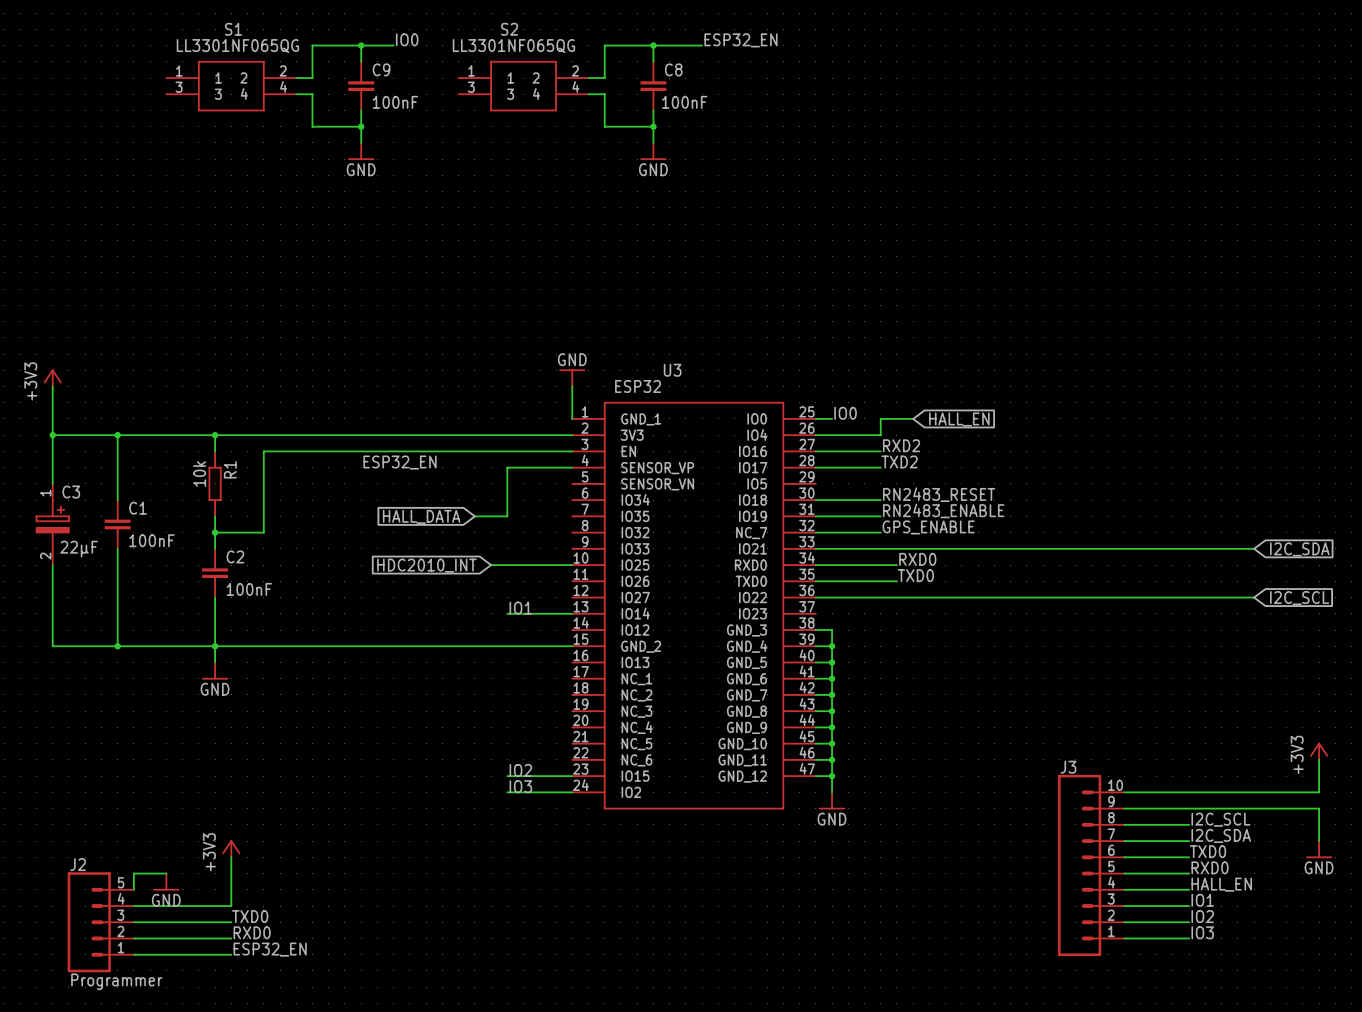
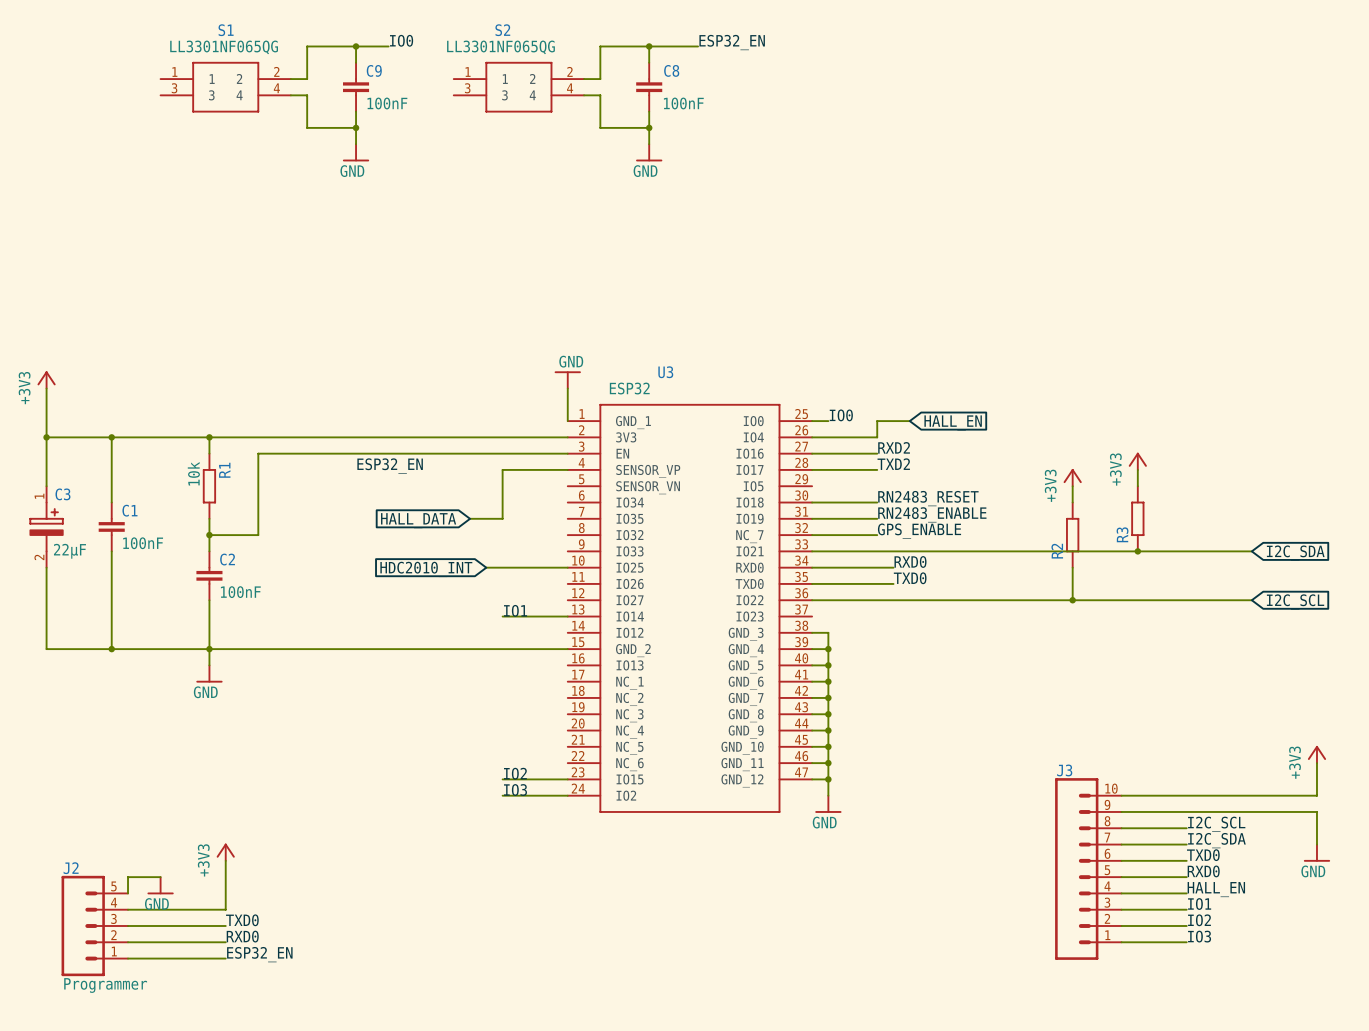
power symbol: none -> +3V3 (1137, 461)
wire: none -> (1137, 469) (1137, 486)
power symbol: none -> +3V3 (1072, 477)
wire: none -> (1072, 486) (1072, 502)
R3: none -> (1137, 518)
R2: none -> (1072, 535)
junction: none -> (1137, 551)
wire: none -> (1072, 567) (1072, 600)
junction: none -> (1072, 600)

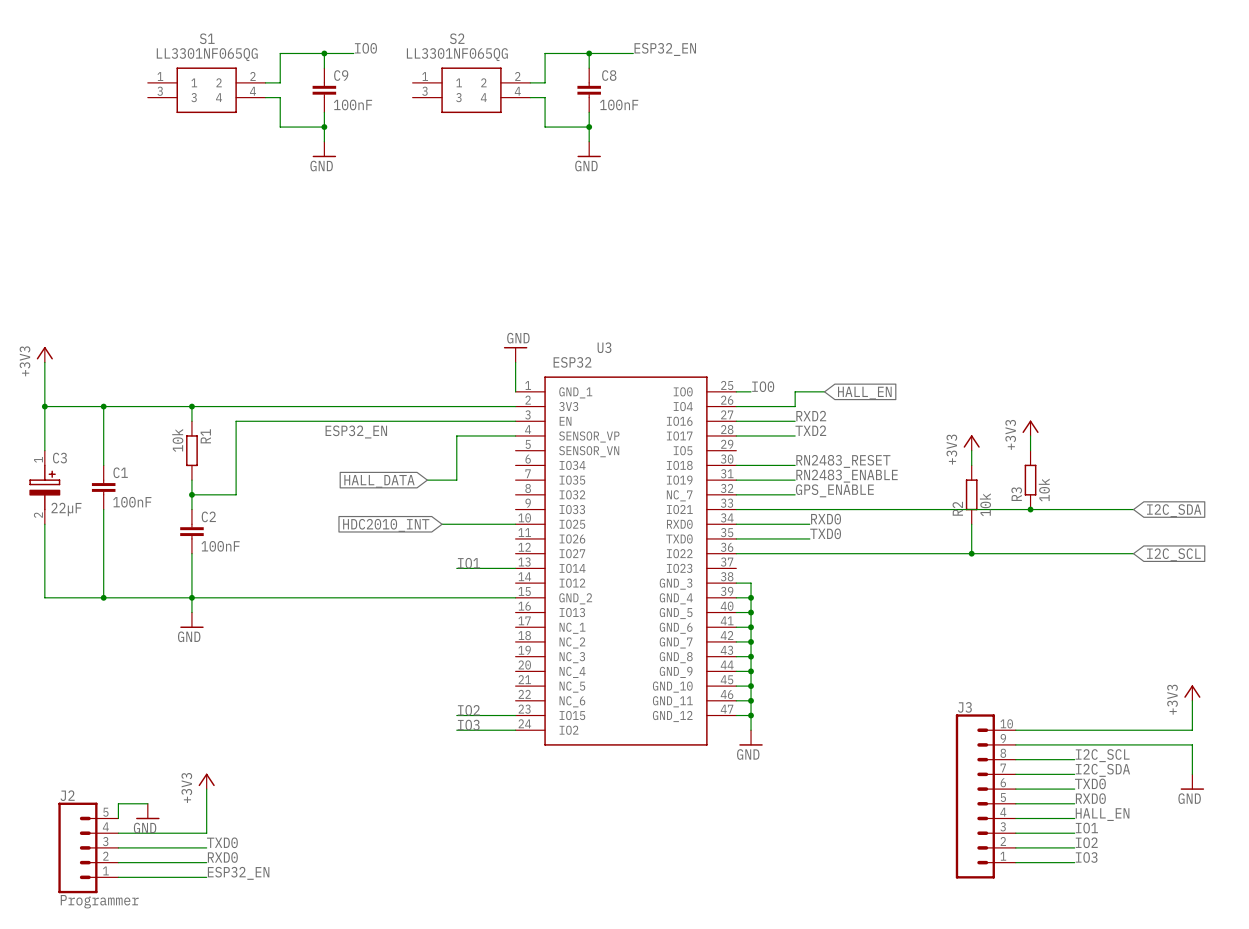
R3 value: none -> 10k (1044, 490)
R2 value: none -> 10k (985, 504)

